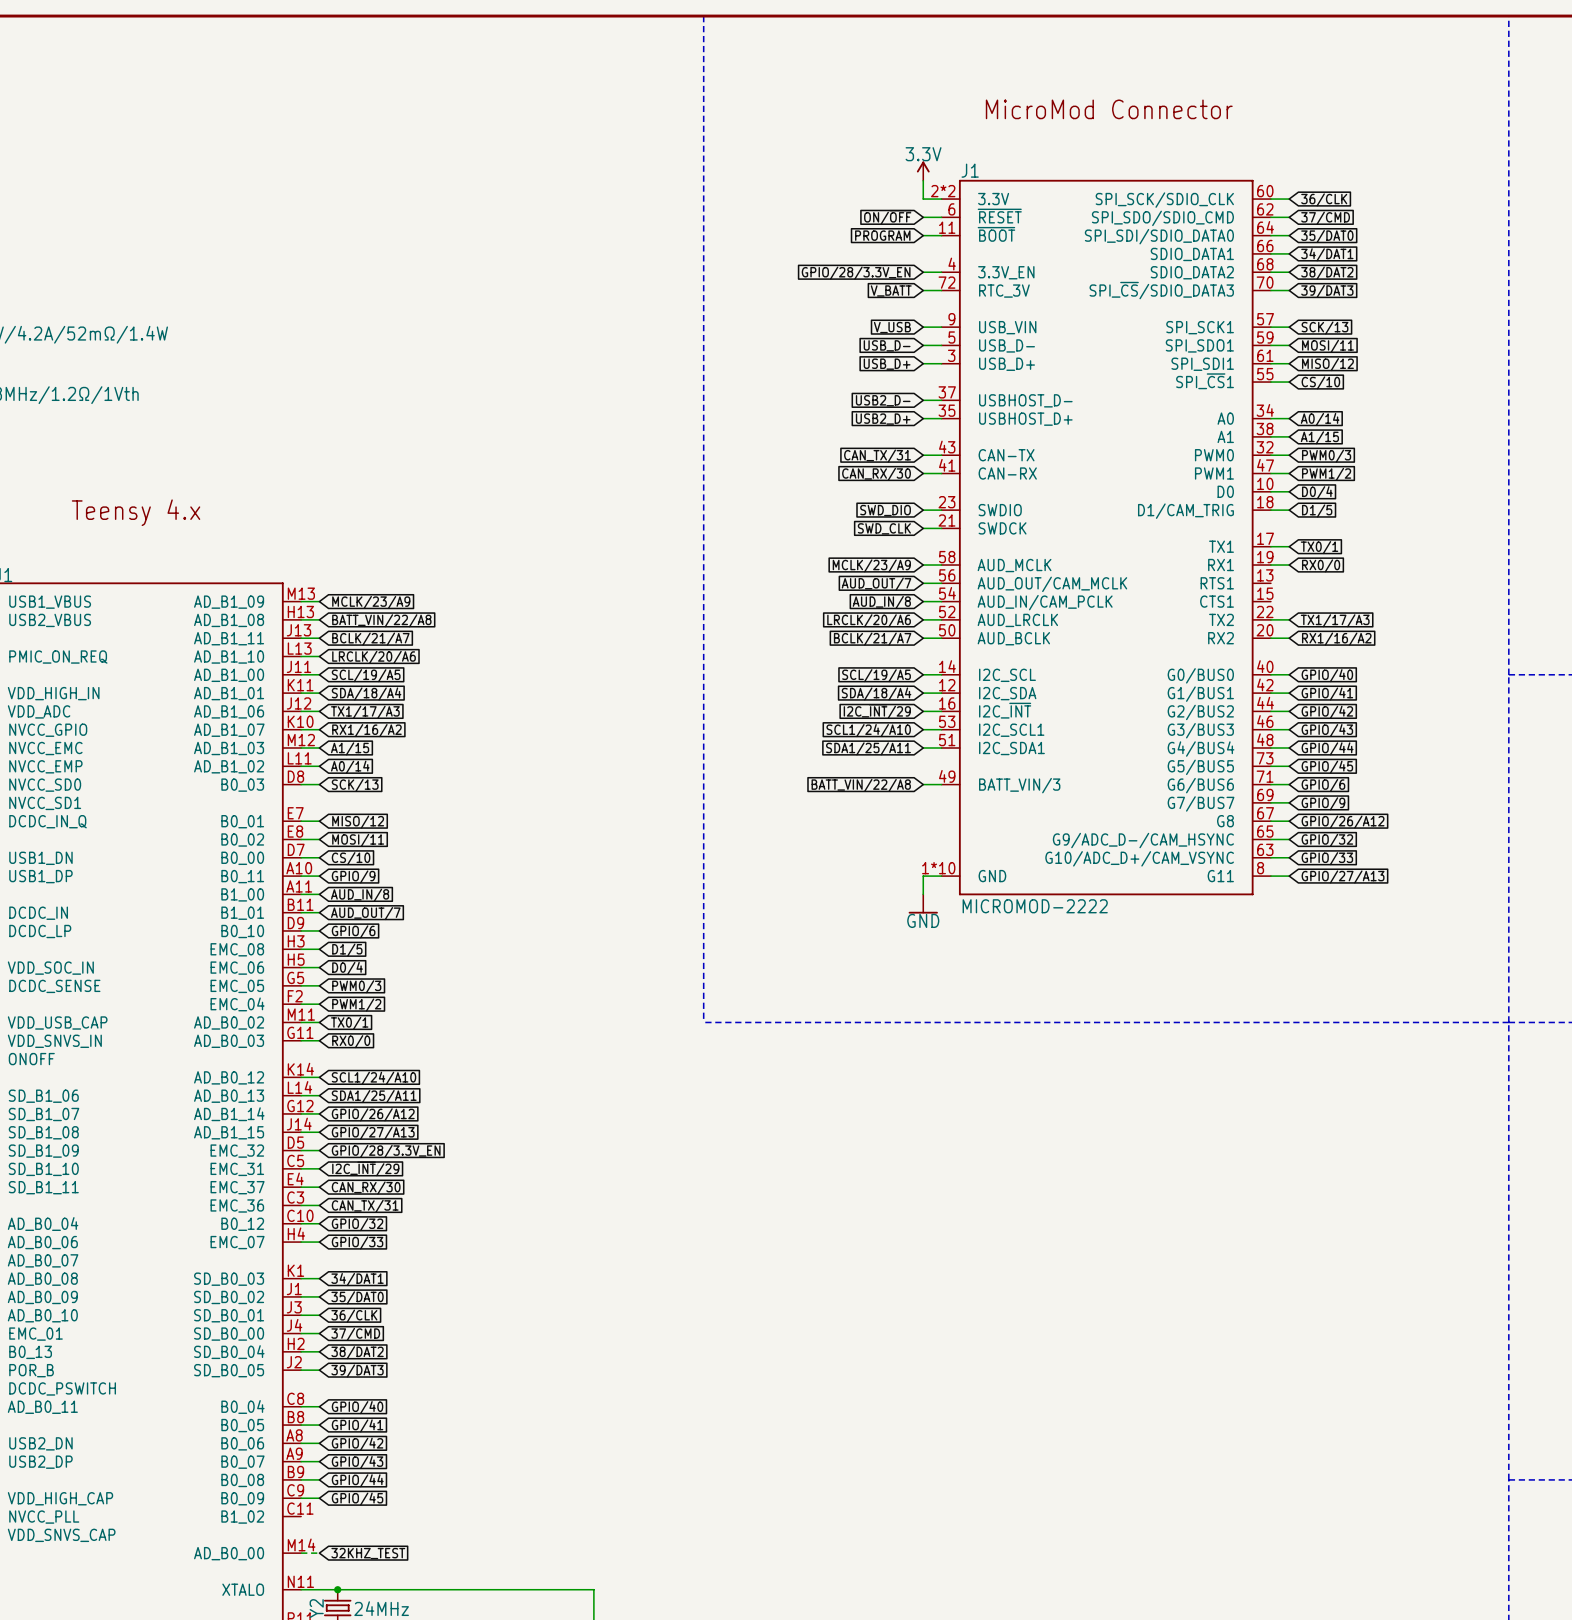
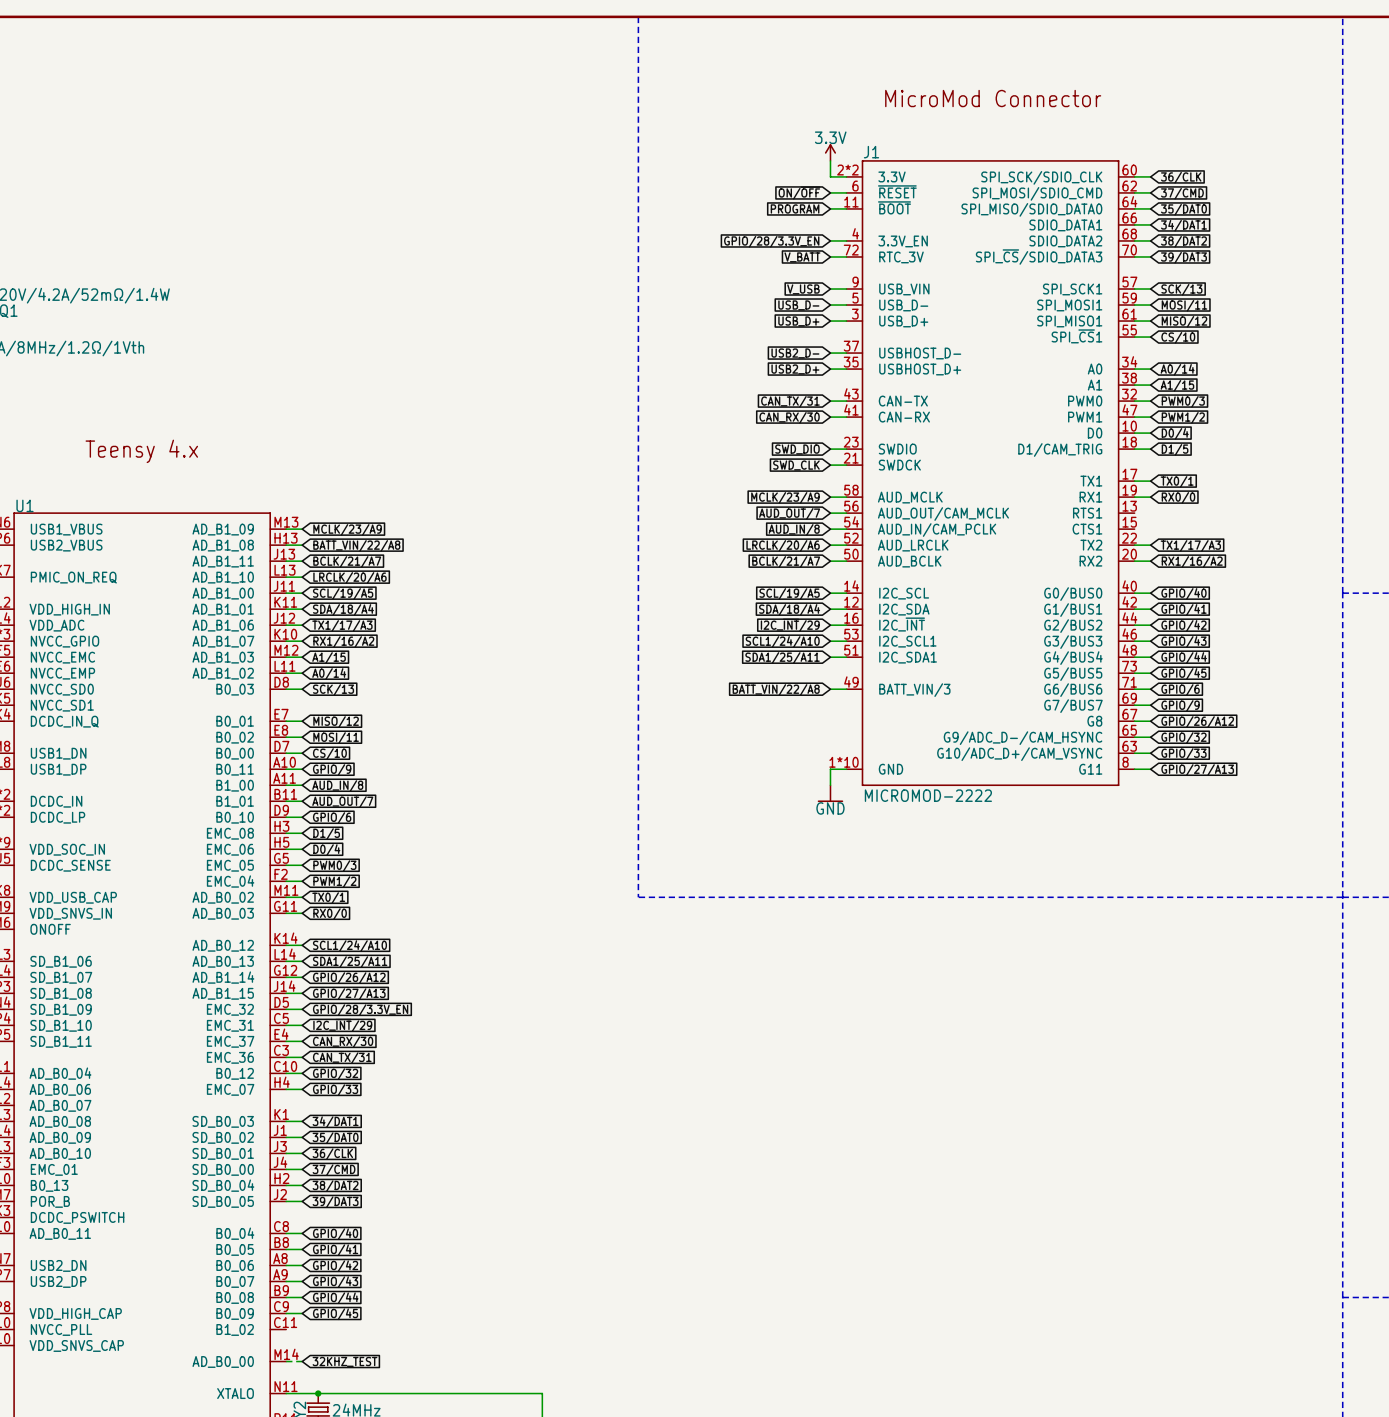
J1 pin name: SPI_SDO/SDIO_CMD (1162, 218) -> SPI_MOSI/SDIO_CMD (1037, 193)
J1 pin name: SPI_SDI/SDIO_DATA0 (1159, 236) -> SPI_MISO/SDIO_DATA0 (1031, 209)
J1 pin name: SPI_SDO1 (1199, 345) -> SPI_MOSI1 (1069, 305)
J1 pin name: SPI_SDI1 (1202, 364) -> SPI_MISO1 (1069, 321)

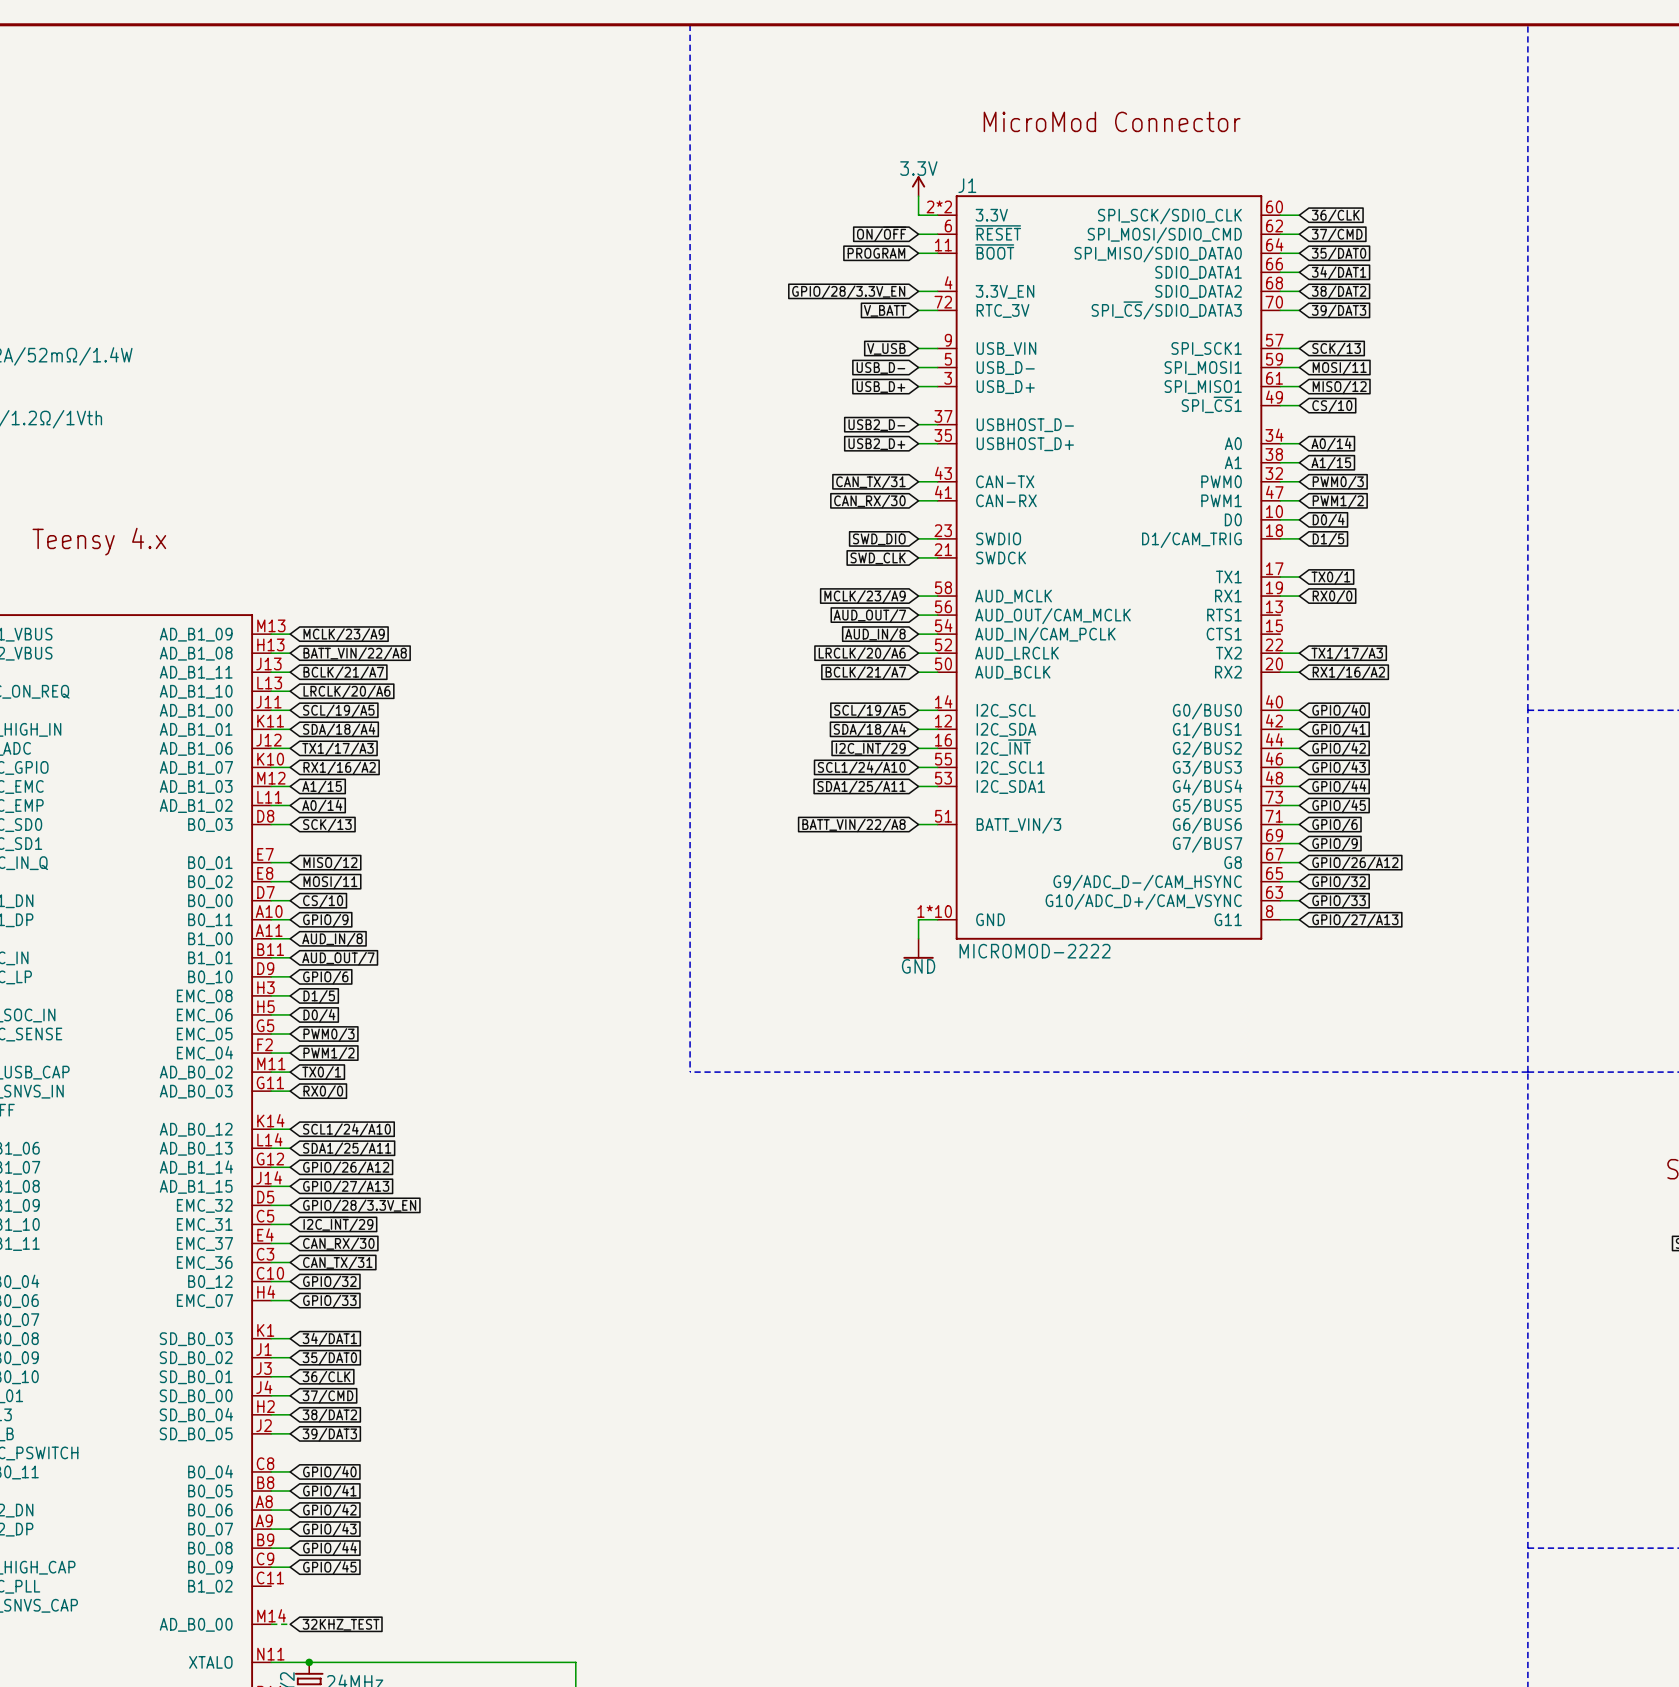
J1 pin number: 55 (1129, 330) -> 49 (1274, 397)
J1 pin number: 53 (851, 634) -> 55 (943, 759)
J1 pin number: 51 (851, 650) -> 53 (943, 778)
J1 pin number: 49 (851, 682) -> 51 (943, 816)

